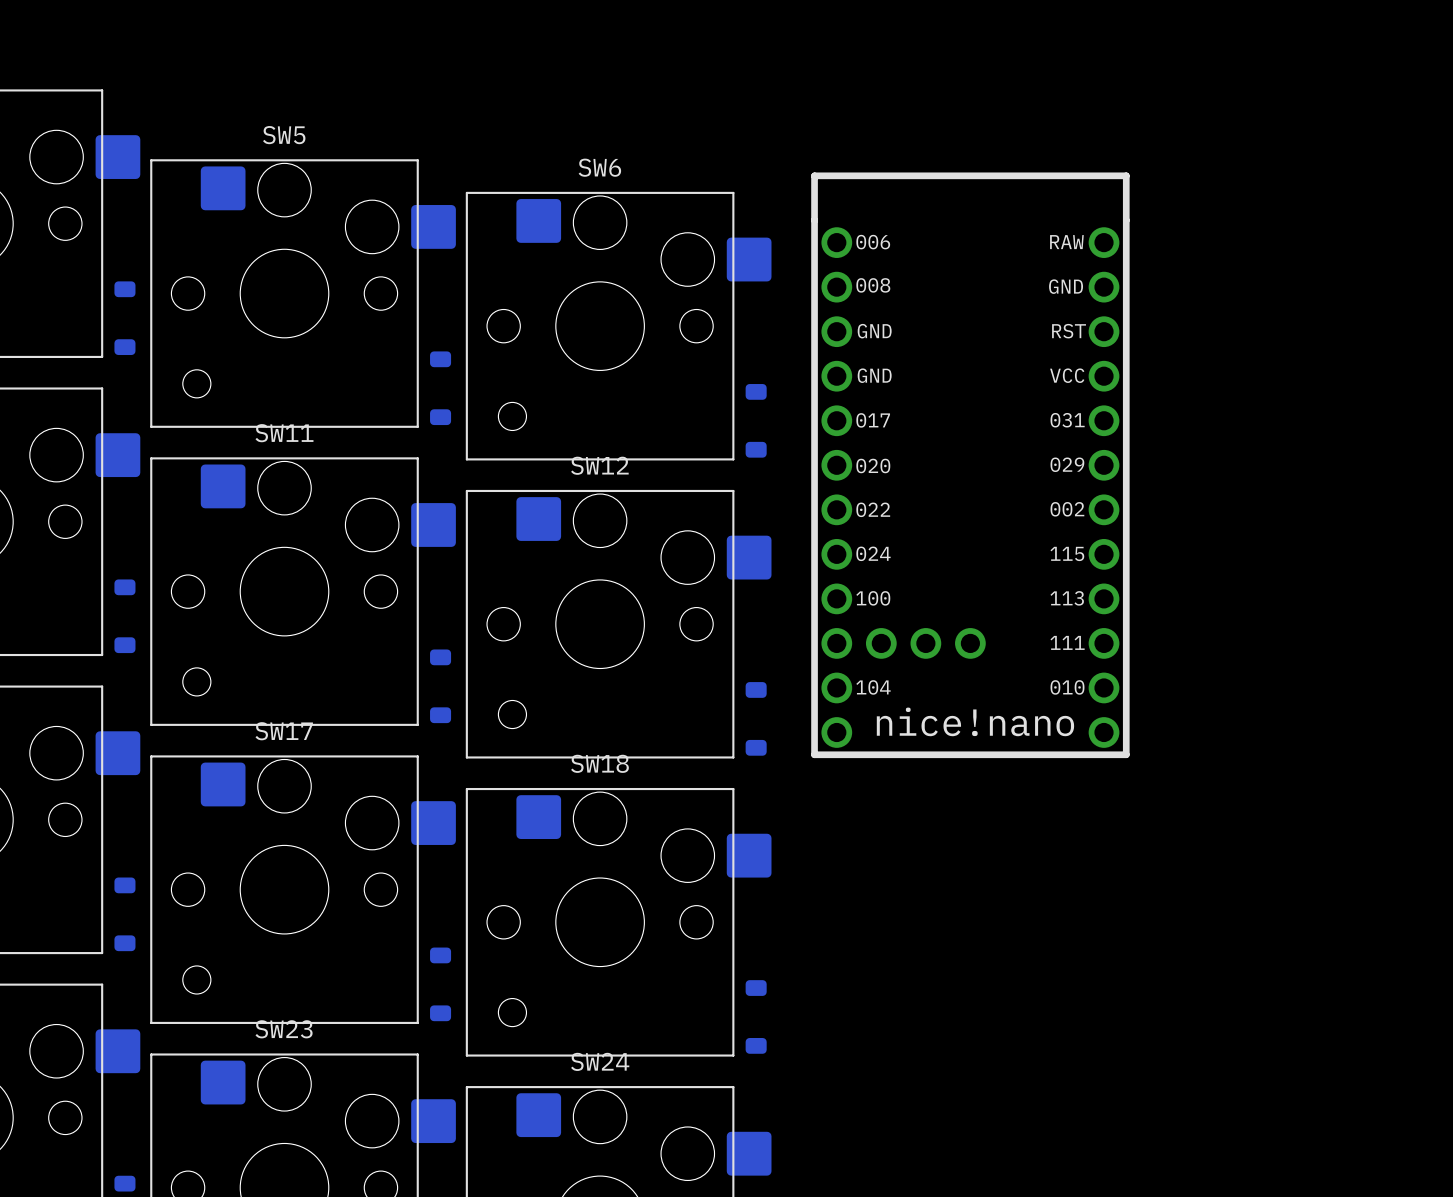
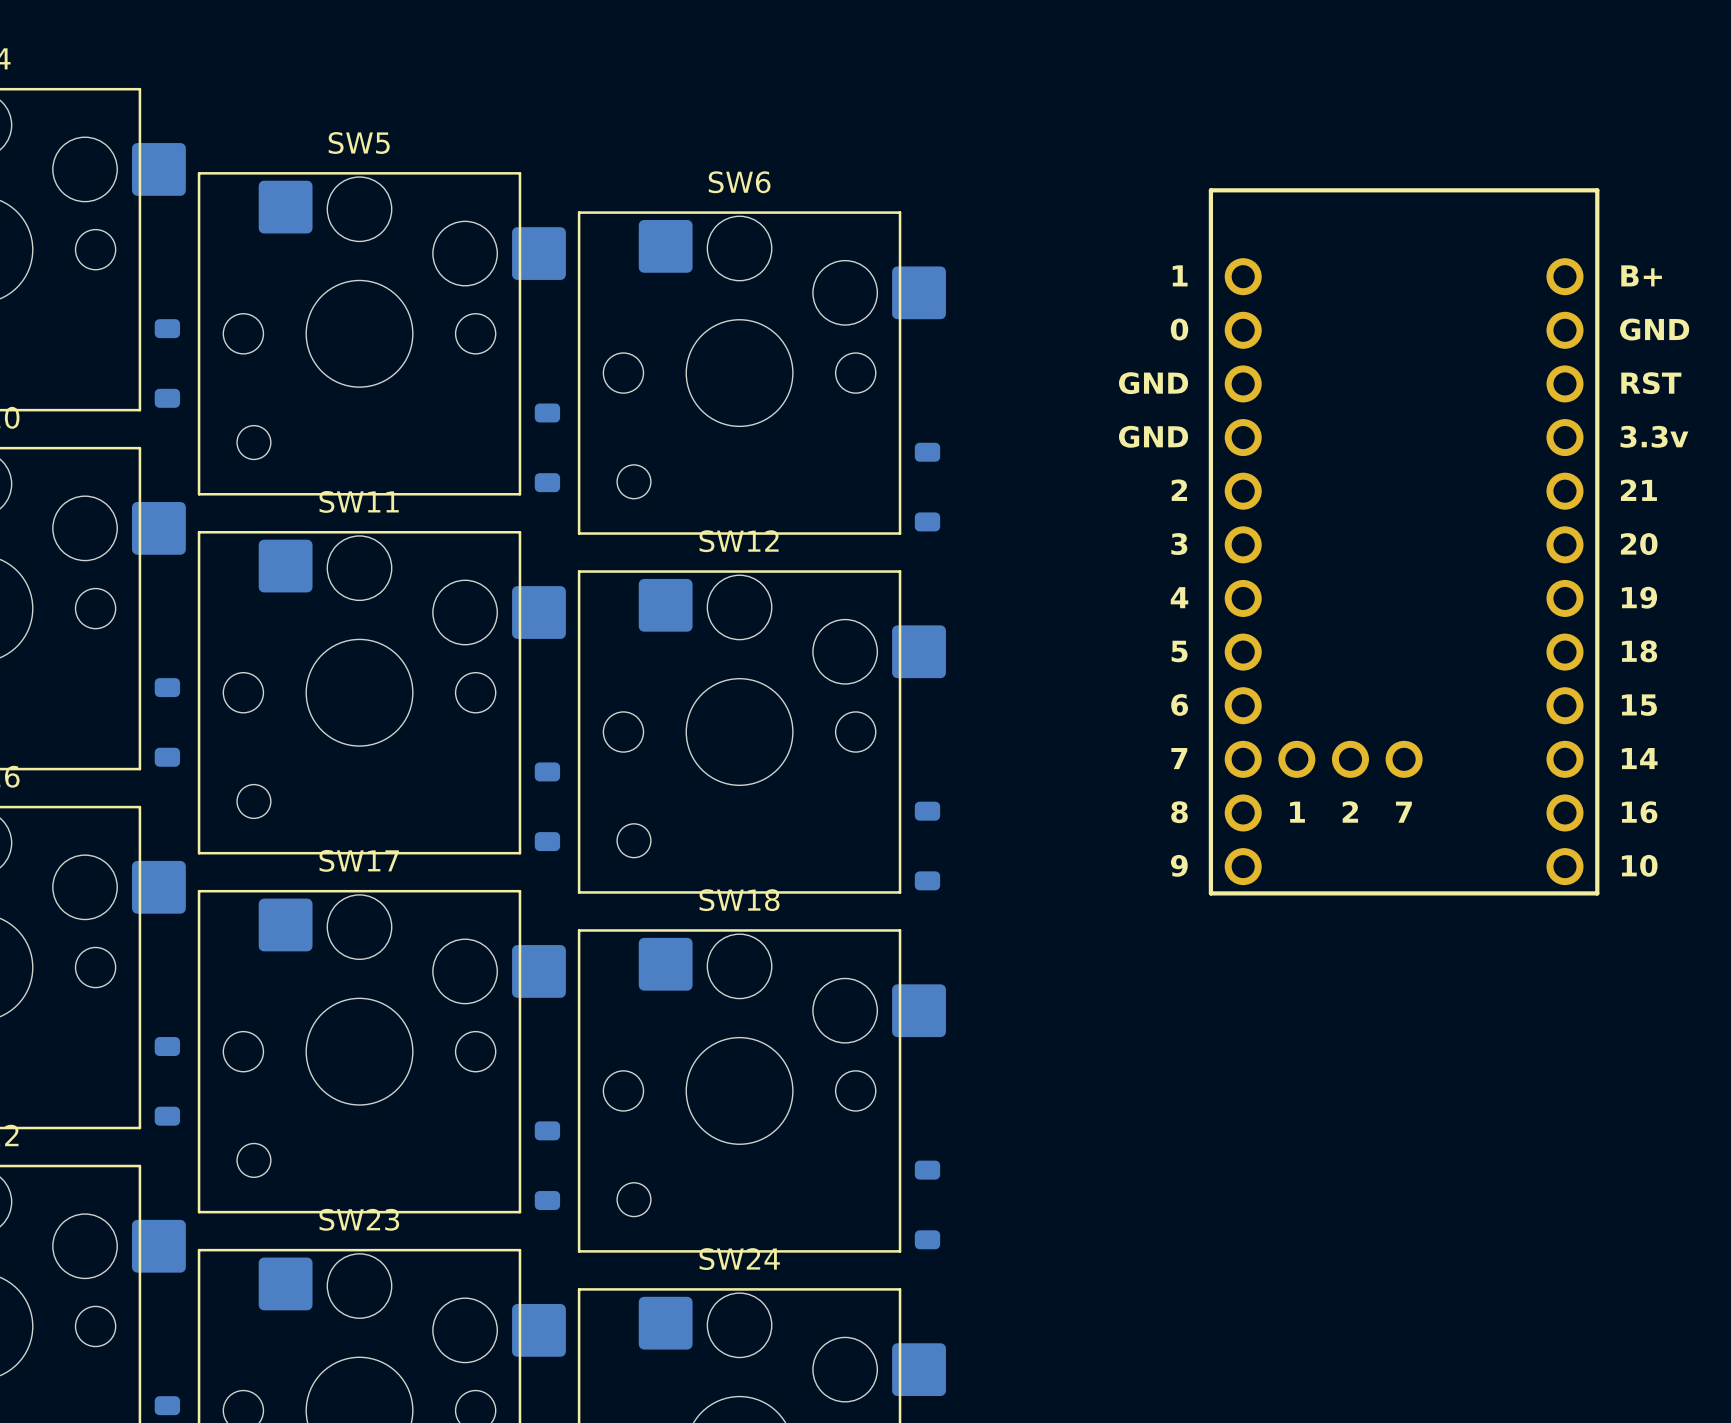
part: (970, 465) -> none
part: none -> (1404, 541)

